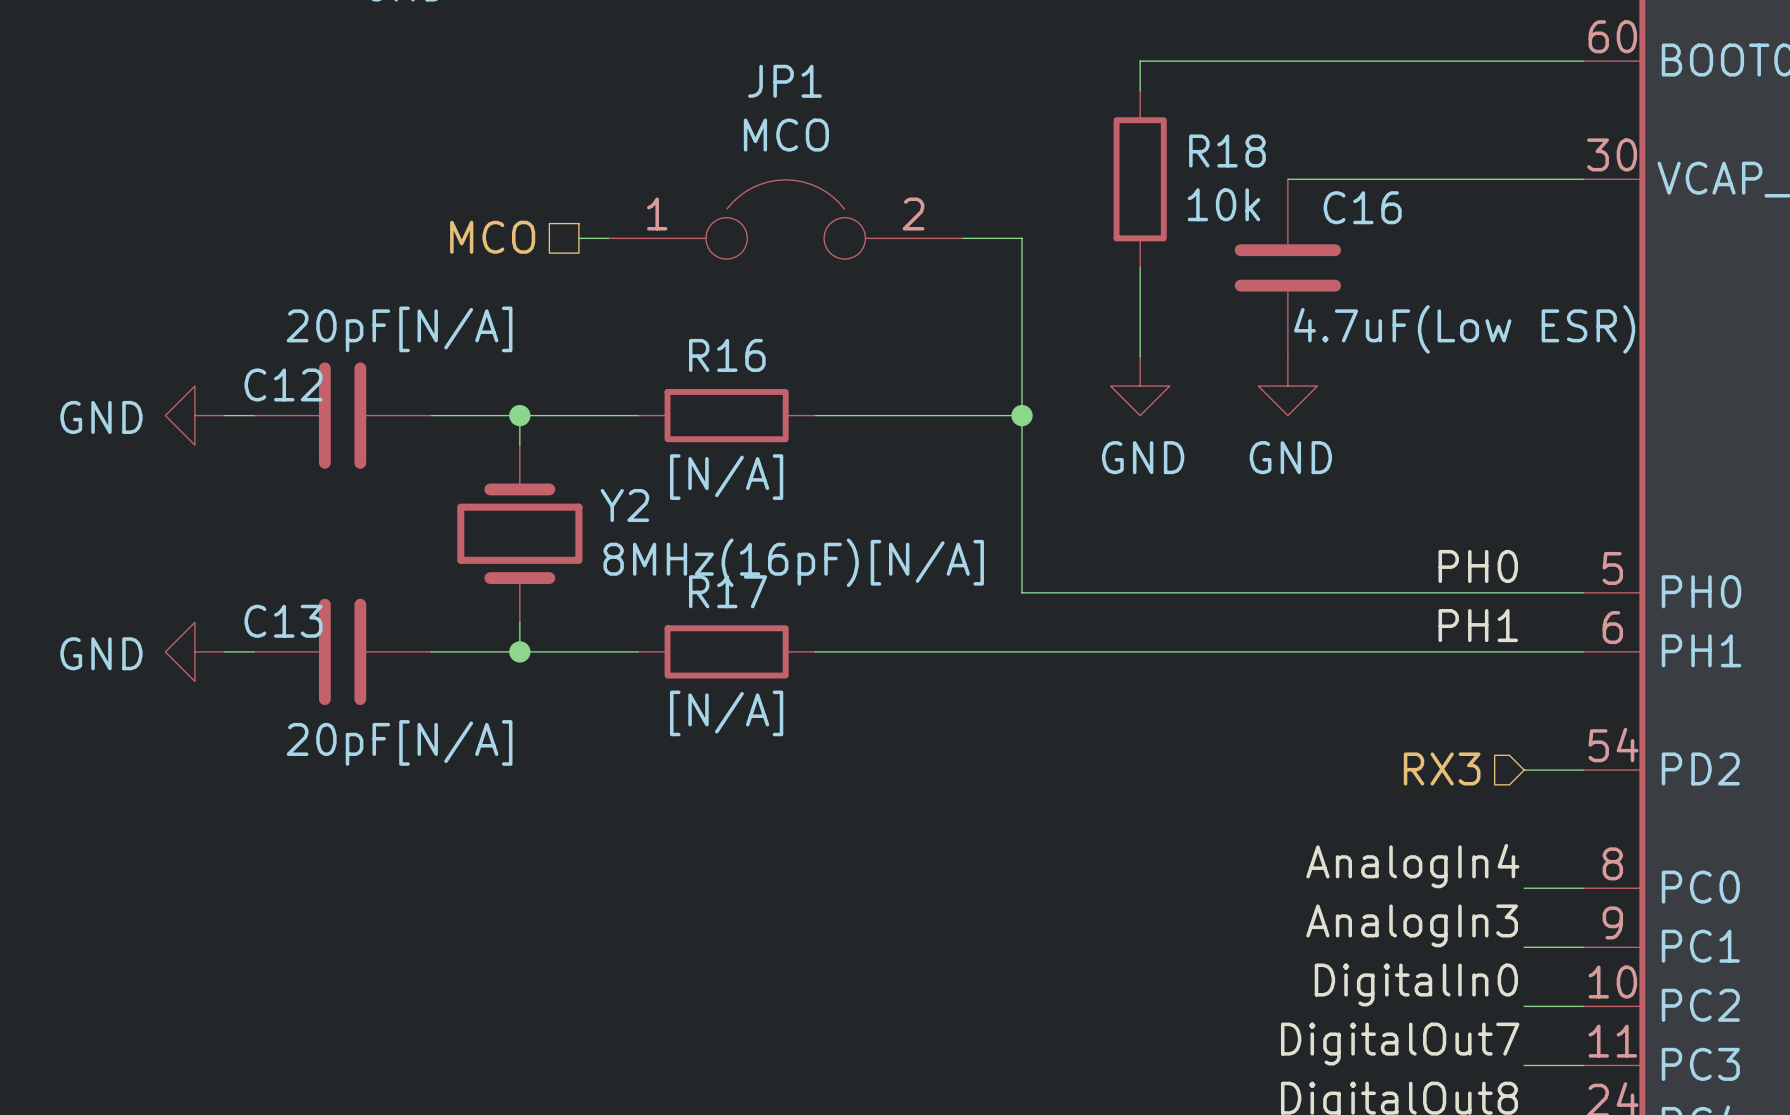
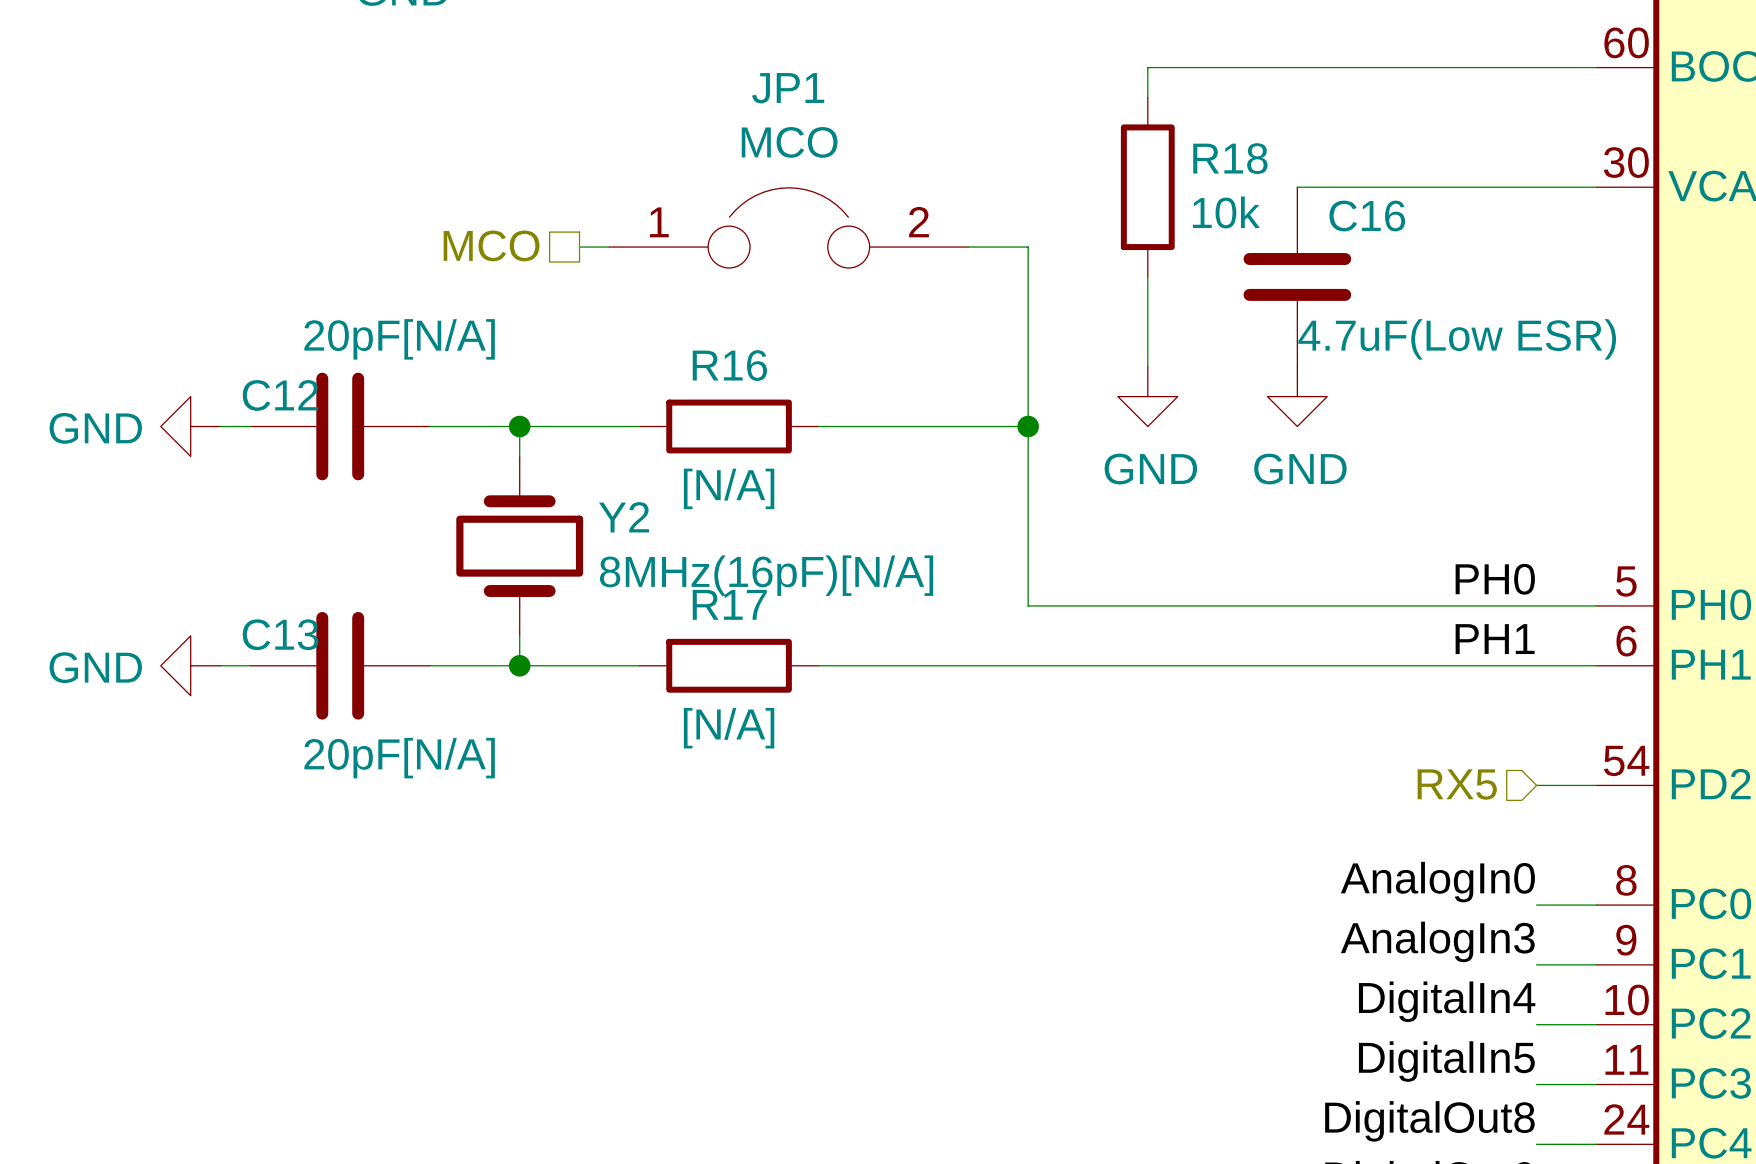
hierarchical label: RX3 (1442, 768) -> RX5 (1457, 784)
label: AnalogIn4 (1412, 866) -> AnalogIn0 (1437, 882)
label: DigitalIn0 (1416, 984) -> DigitalIn4 (1447, 1001)
label: DigitalOut7 (1400, 1044) -> DigitalIn5 (1446, 1061)

